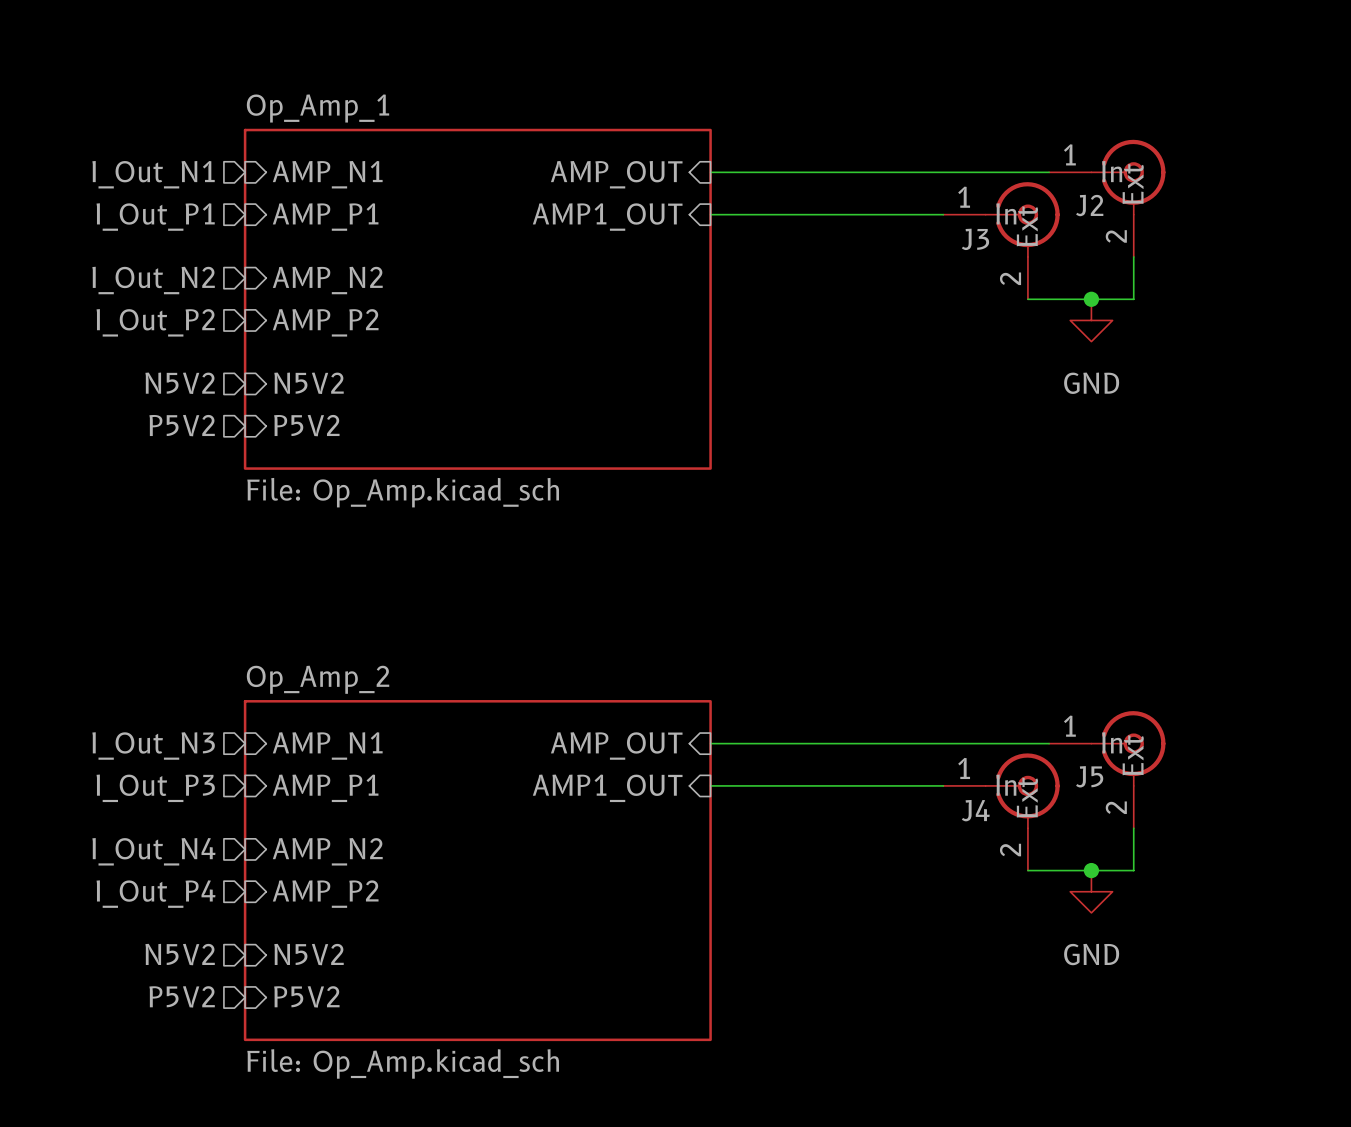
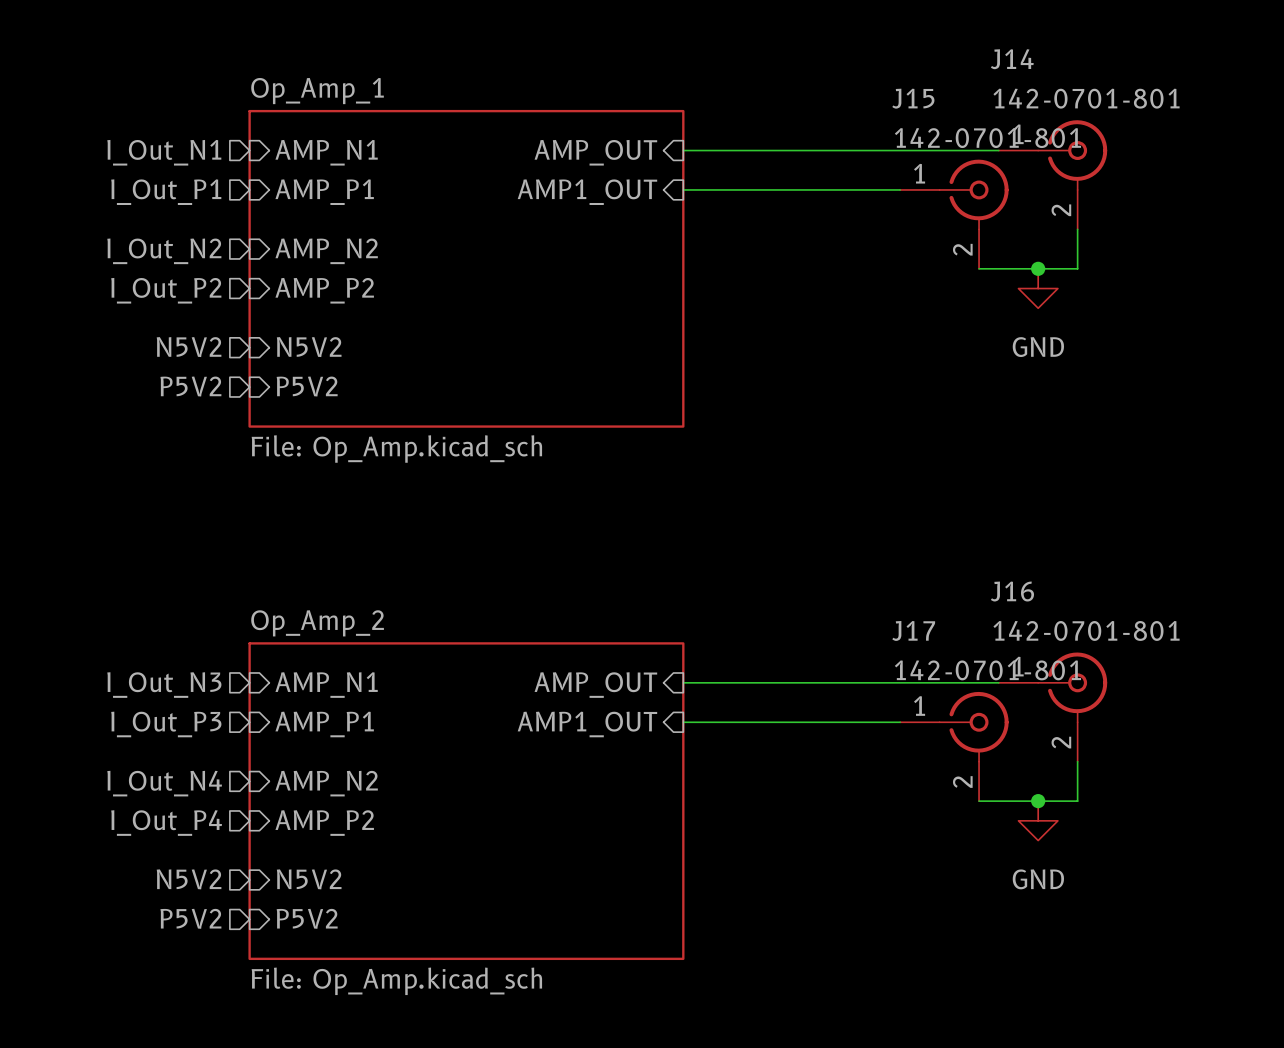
J2 value: none -> 142-0701-801 (1086, 98)
J3 value: none -> 142-0701-801 (987, 138)
J2 pin name: In (1112, 171) -> none
J2 pin name: Ext (1133, 184) -> none
J2 name: J2 (1089, 205) -> J14 (1012, 59)
J3 pin name: In (1006, 213) -> none
J3 pin name: Ext (1027, 226) -> none
J3 name: J3 (975, 239) -> J15 (913, 98)
J5 value: none -> 142-0701-801 (1086, 630)
J4 value: none -> 142-0701-801 (987, 670)
J5 pin name: In (1112, 742) -> none
J5 pin name: Ext (1133, 755) -> none
J5 name: J5 (1089, 776) -> J16 (1012, 591)
J4 pin name: In (1006, 785) -> none
J4 pin name: Ext (1027, 797) -> none
J4 name: J4 (975, 810) -> J17 (913, 630)

